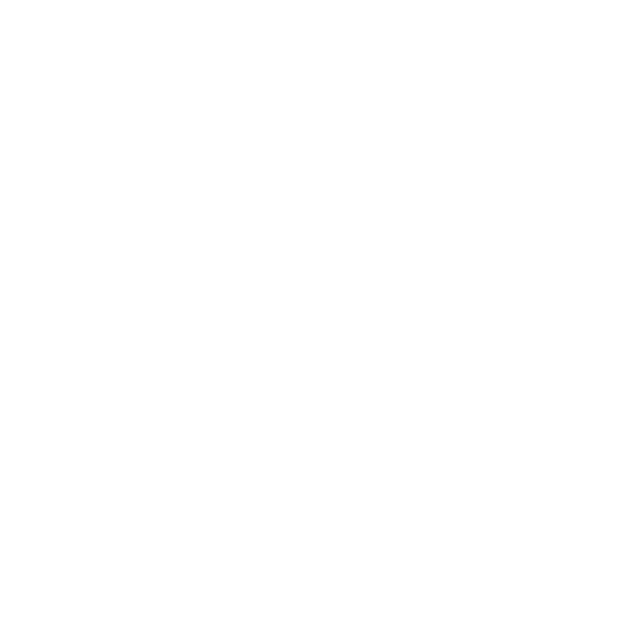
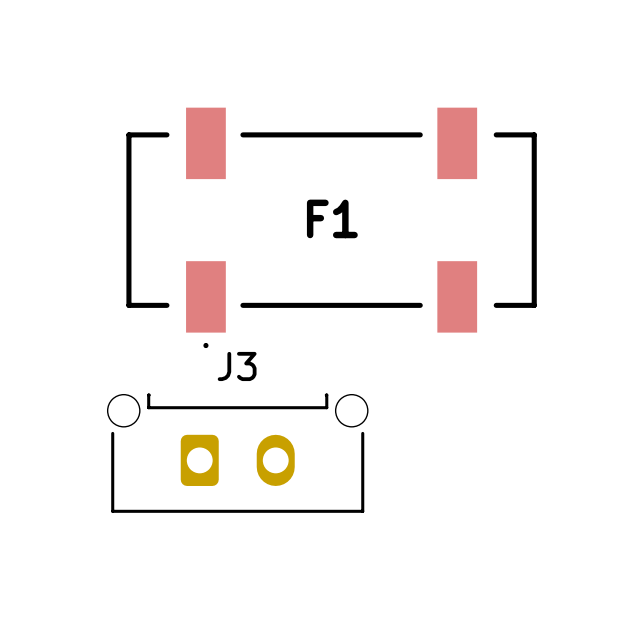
F1: none -> (331, 227)
J3: none -> (237, 453)

